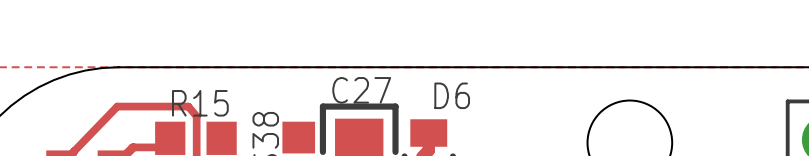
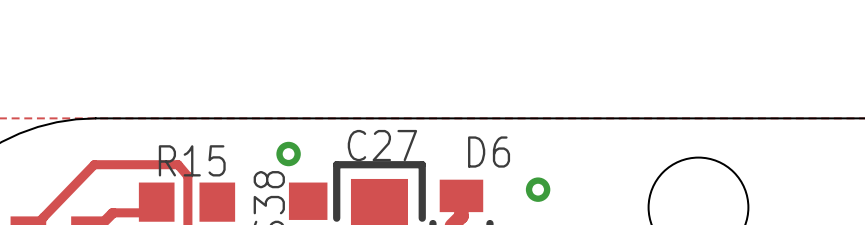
via: none -> (288, 154)
via: none -> (538, 189)

